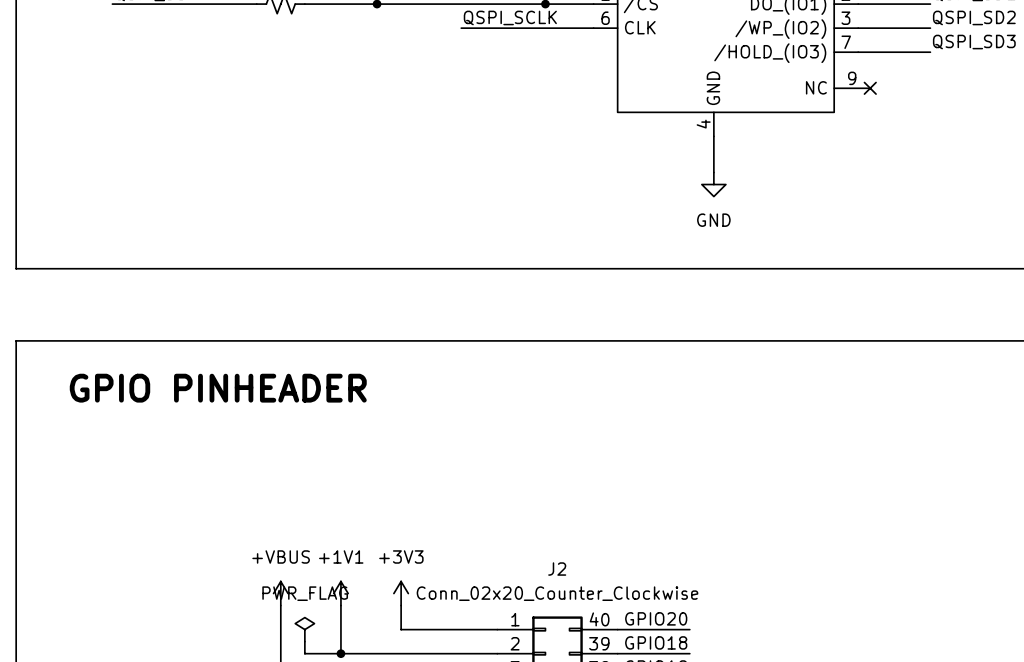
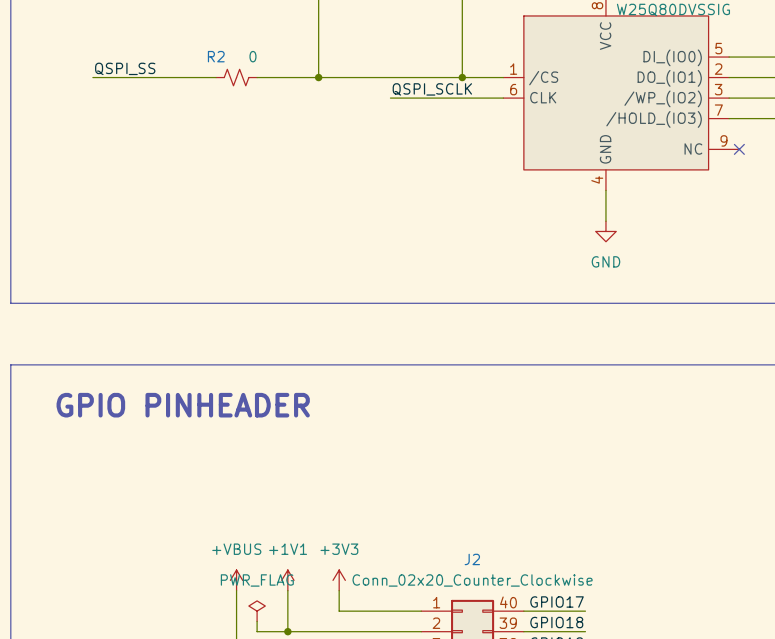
label: GPIO20 (656, 618) -> GPIO17 (557, 602)

